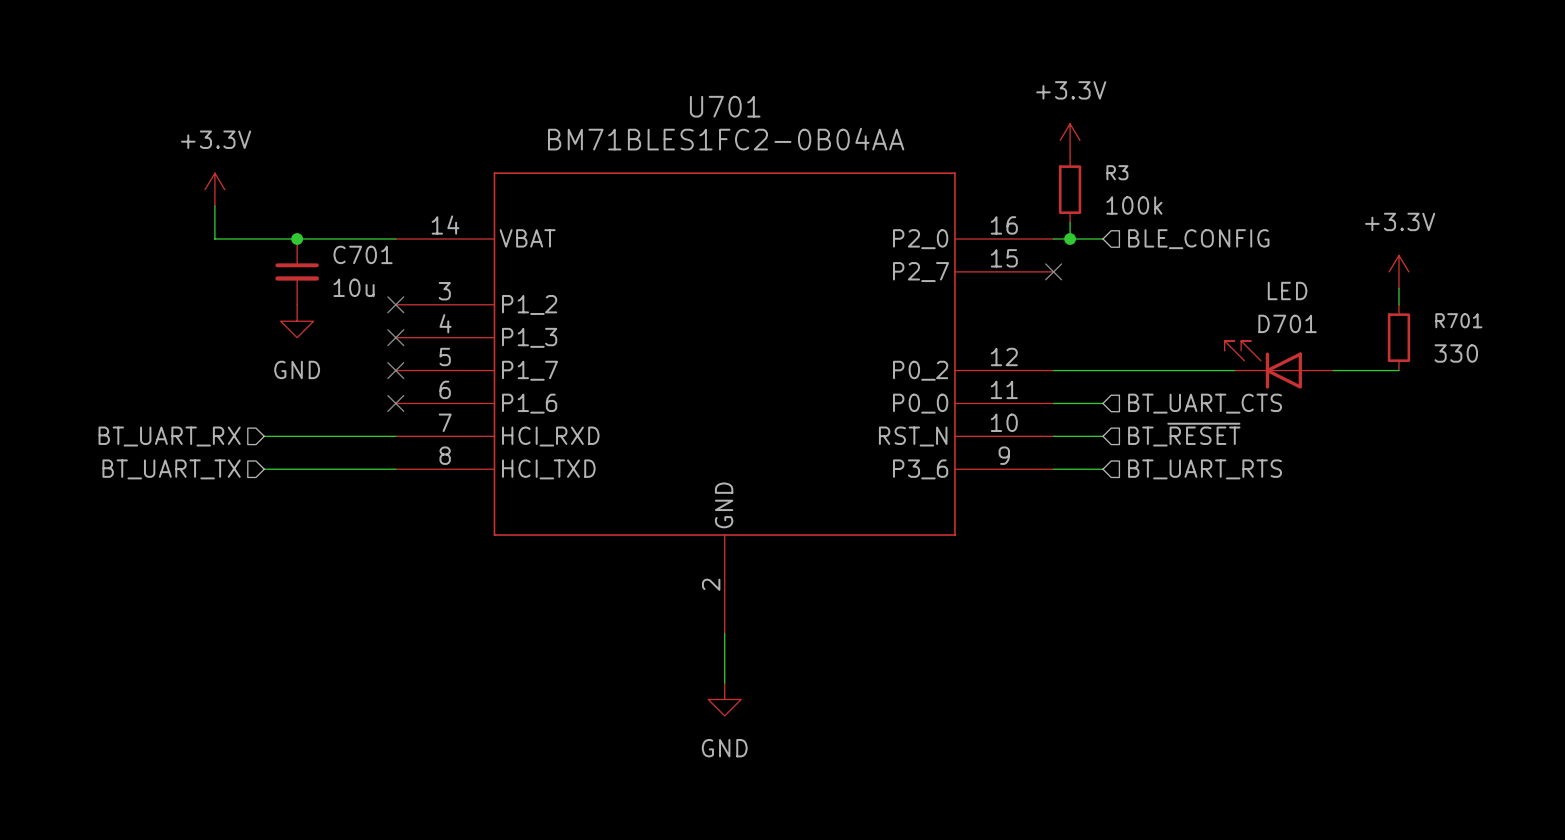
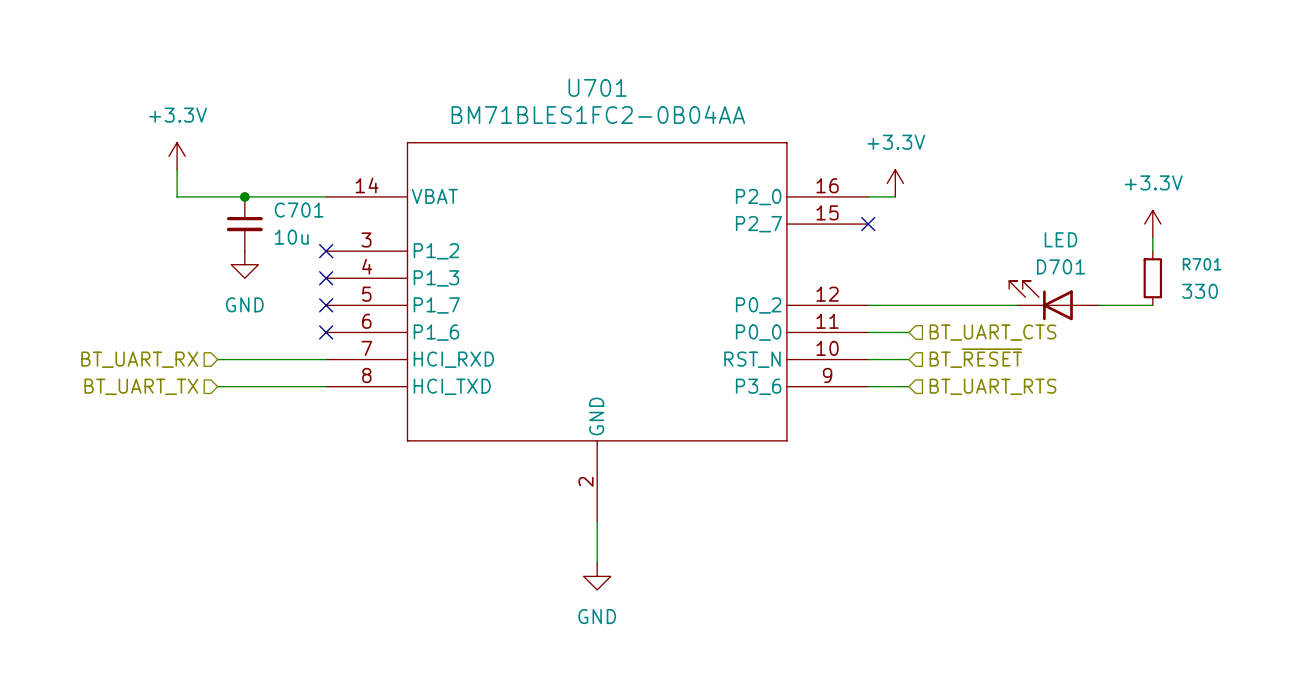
power symbol position: +3.3V (1070, 140) -> +3.3V (895, 183)
R3: 100k (1070, 189) -> none
wire: (1070, 222) (1070, 239) -> none
junction: (1070, 239) -> none
wire: (1086, 239) (1102, 239) -> none
hierarchical label: BLE_CONFIG (1198, 239) -> none

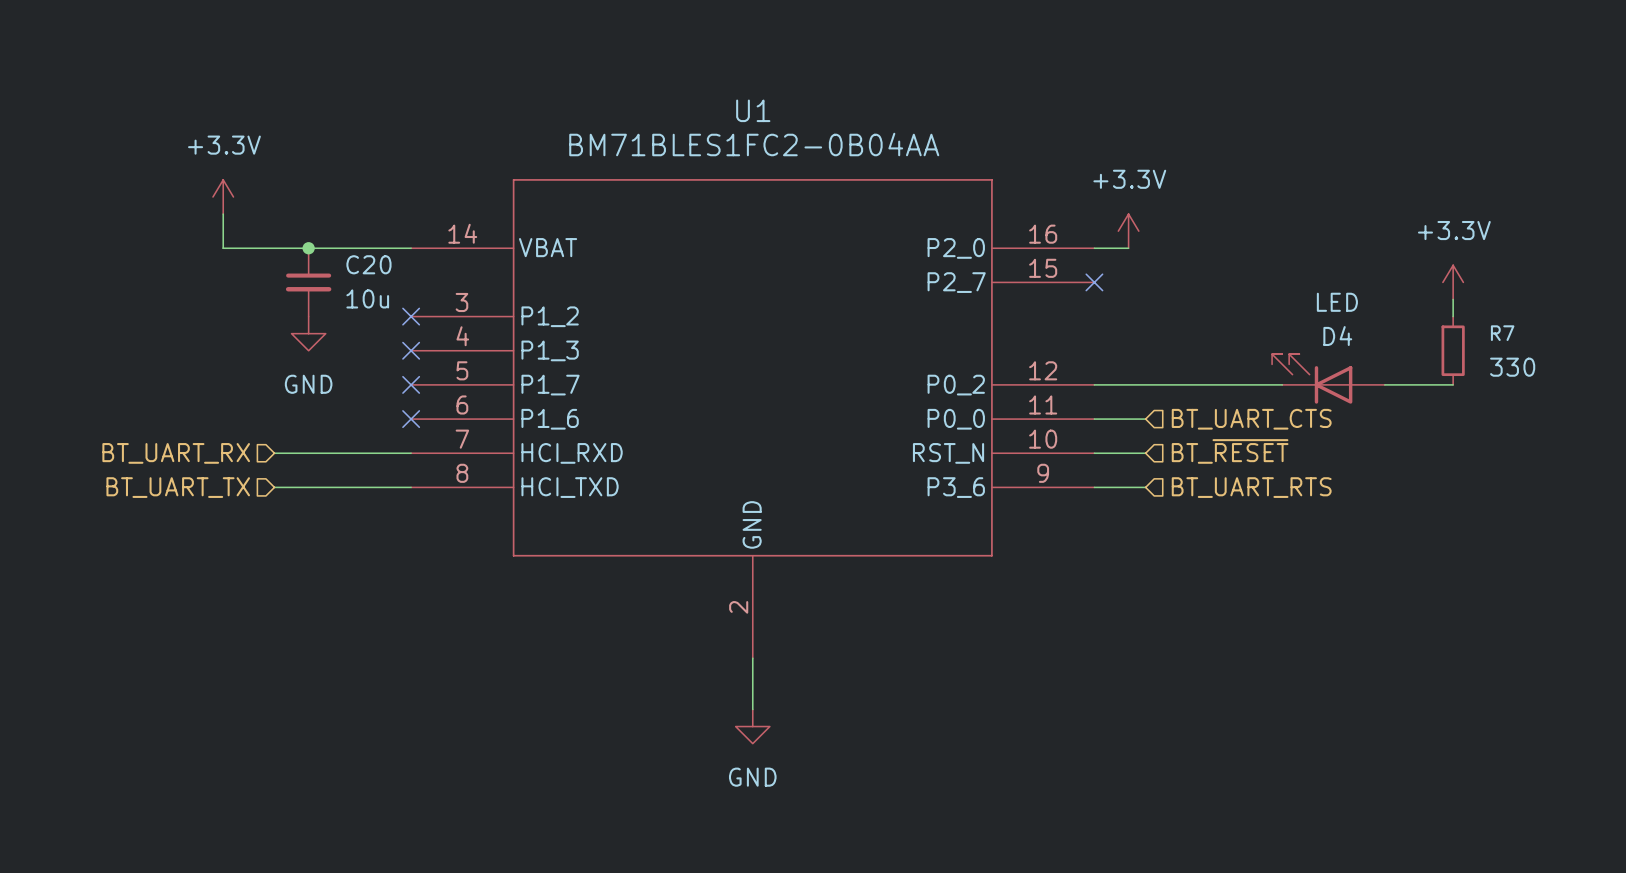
U701 name: U701 (597, 87) -> U1 (753, 110)
C701 name: C701 (299, 210) -> C20 (368, 264)
R701 name: R701 (1202, 264) -> R7 (1502, 333)
D701 name: D701 (1060, 266) -> D4 (1337, 336)

